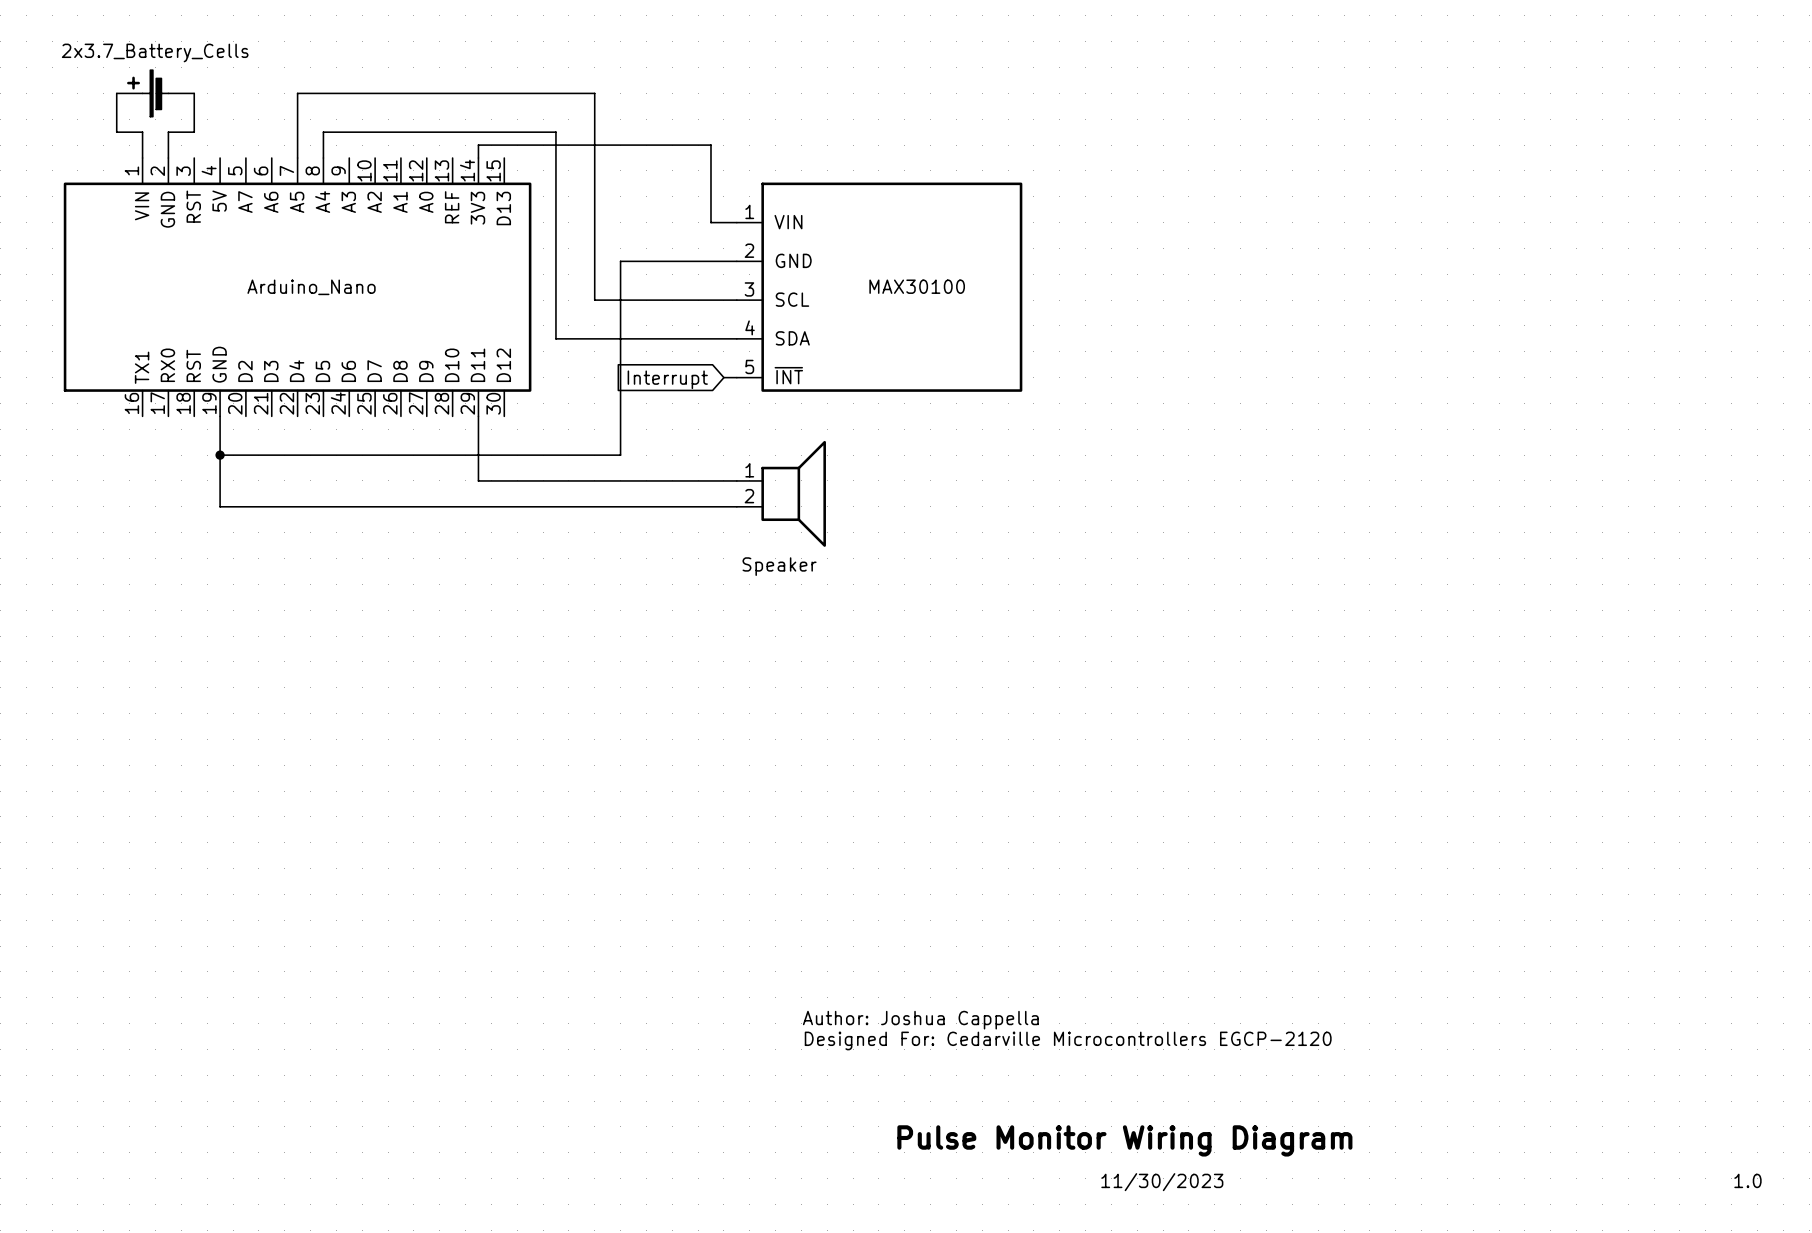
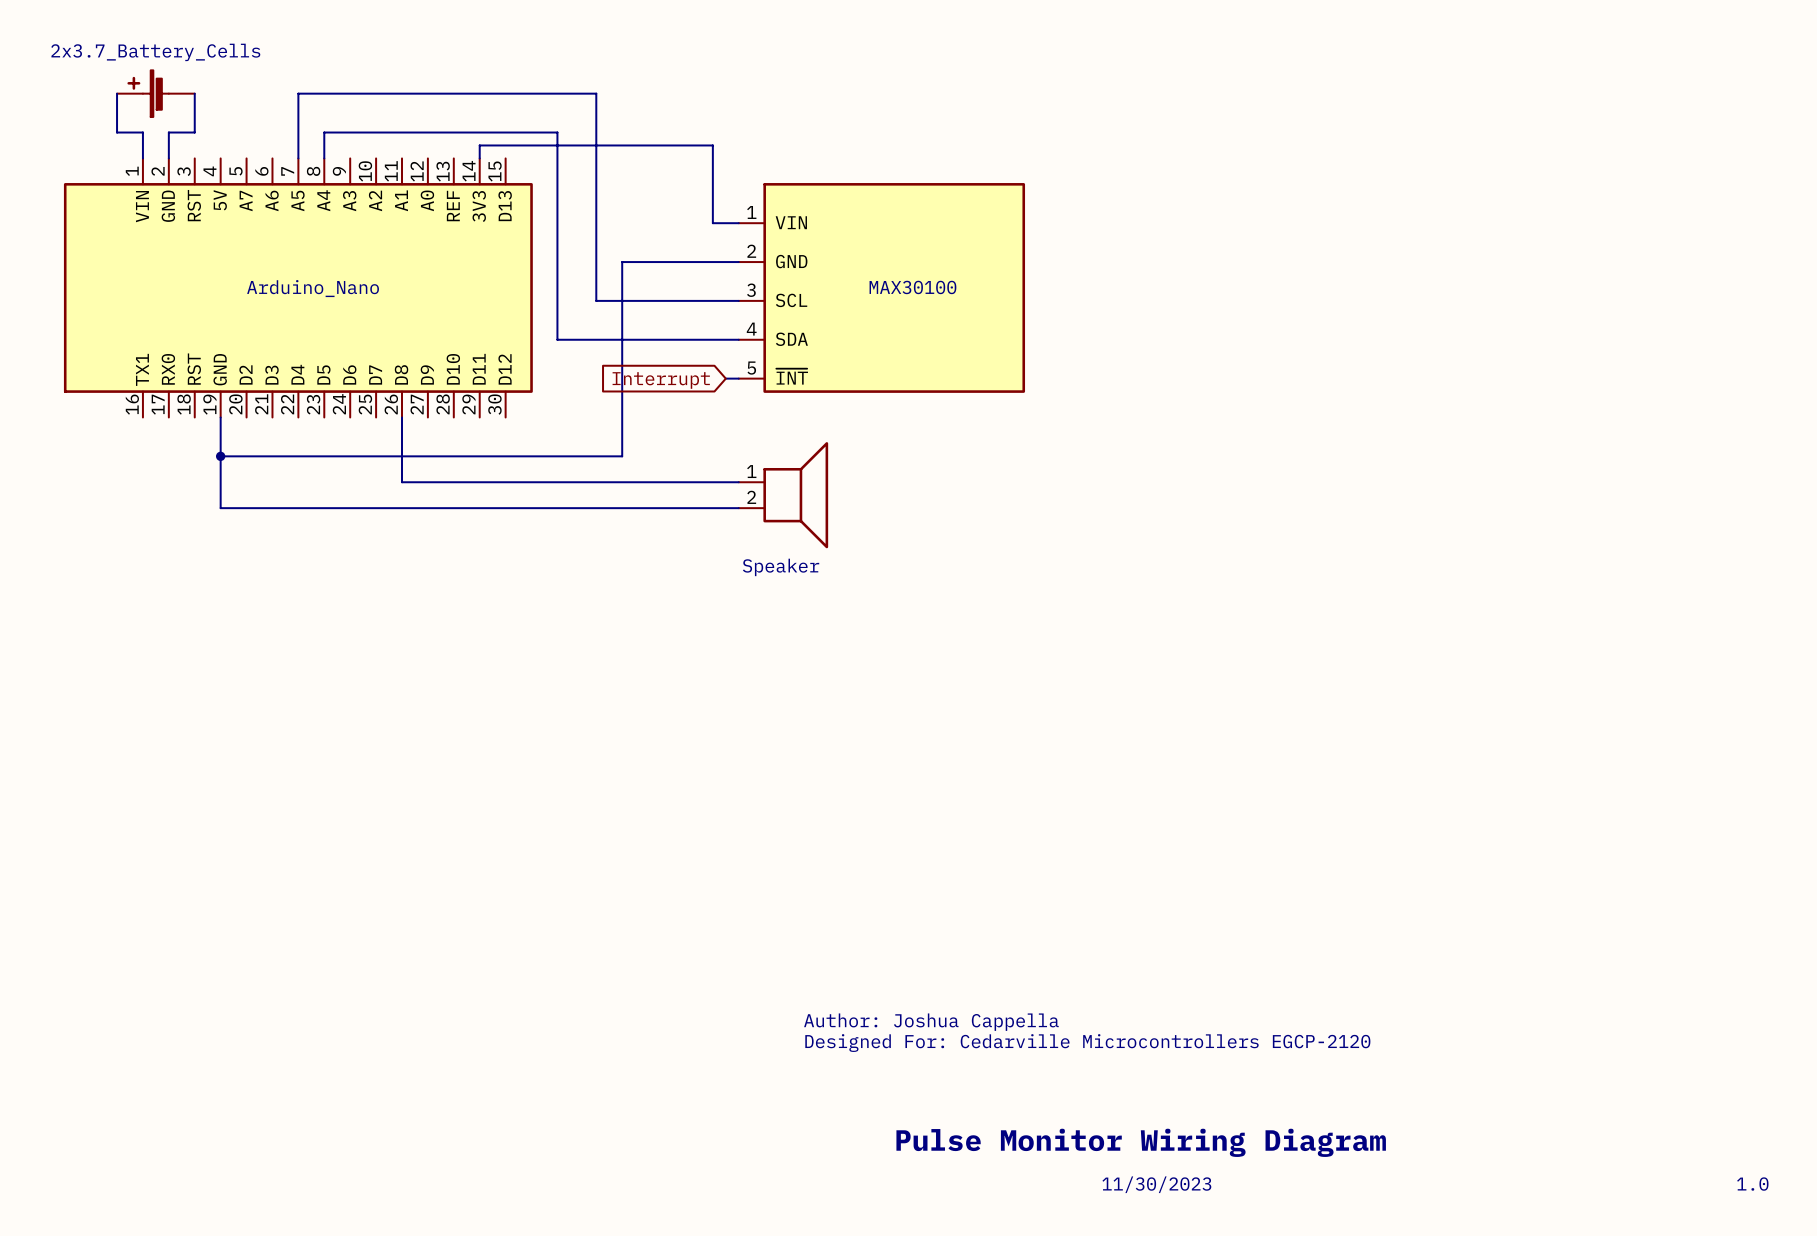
wire: (478, 416) (478, 480) -> (402, 417) (402, 482) (479, 482)

